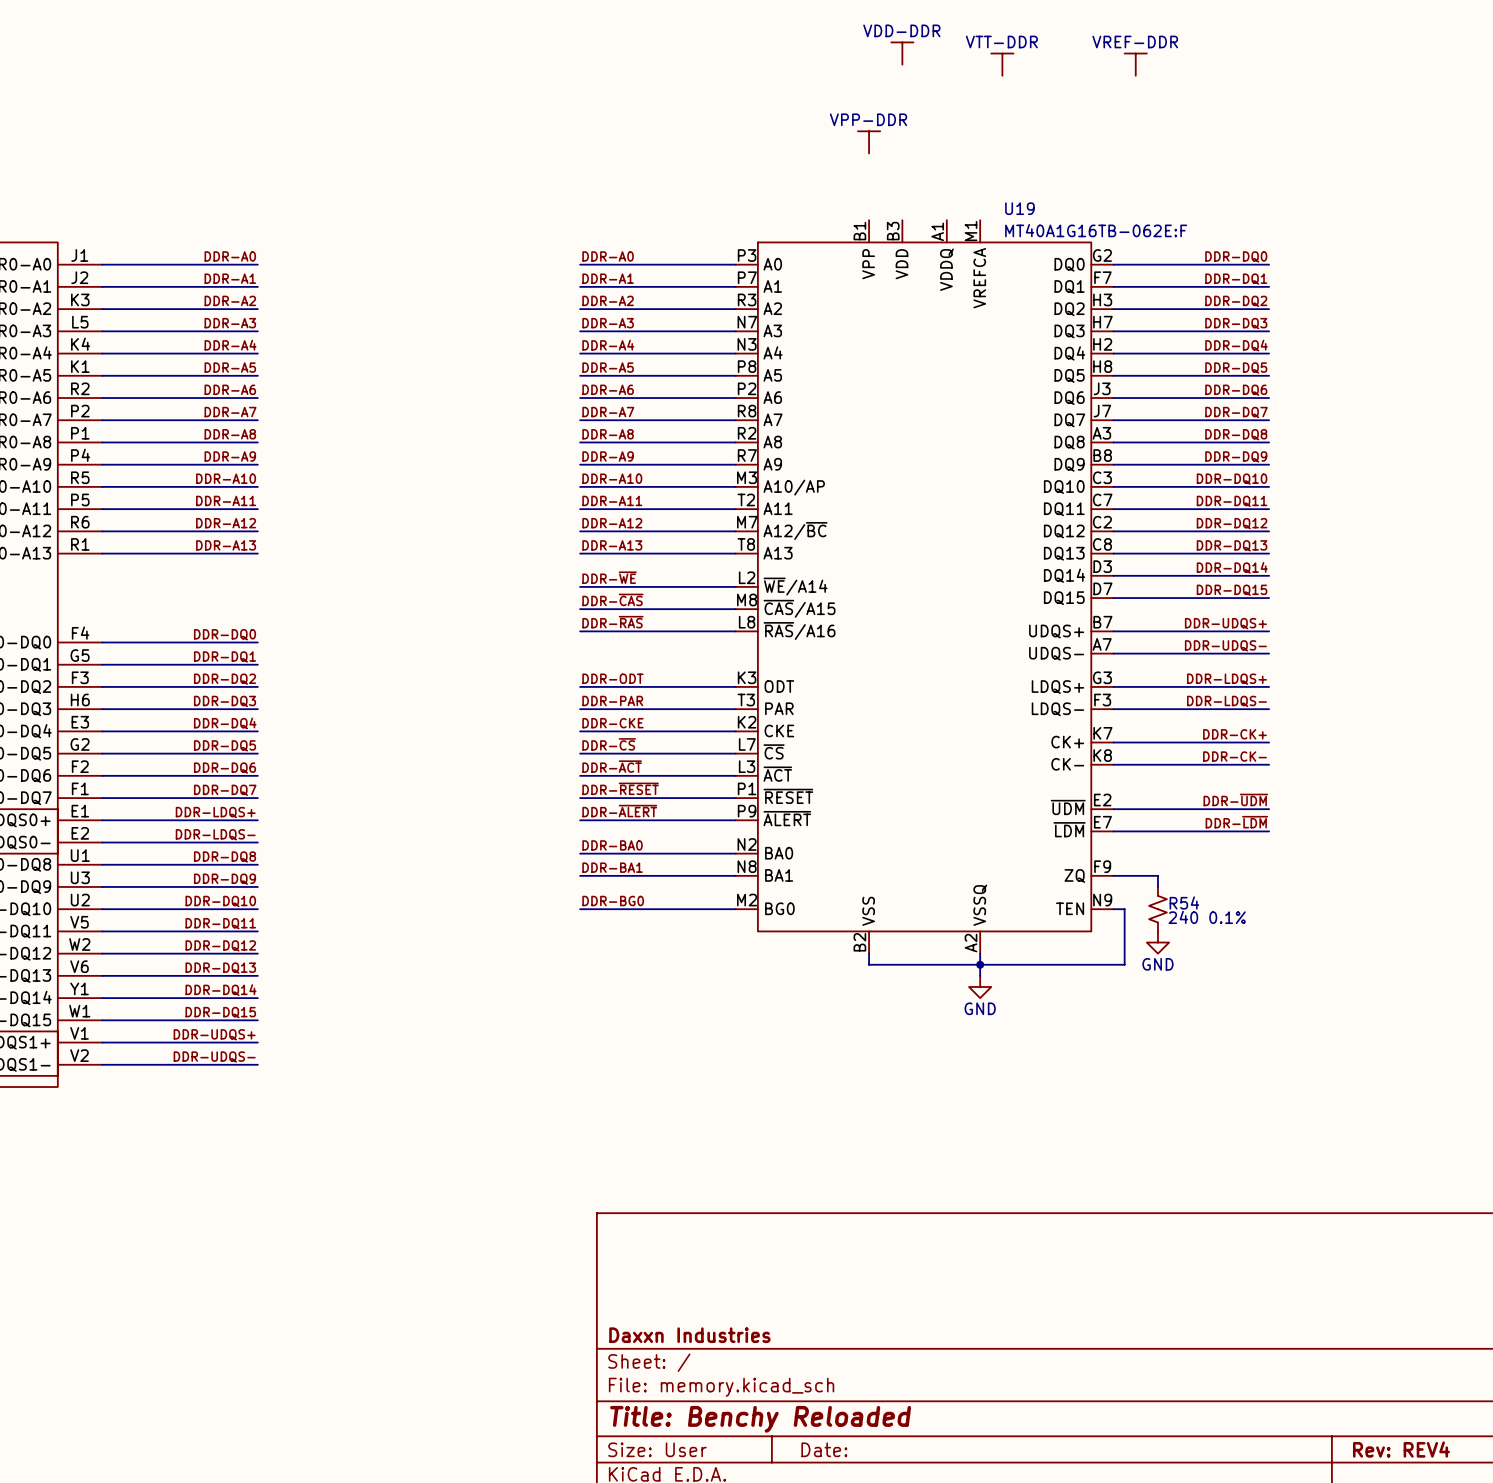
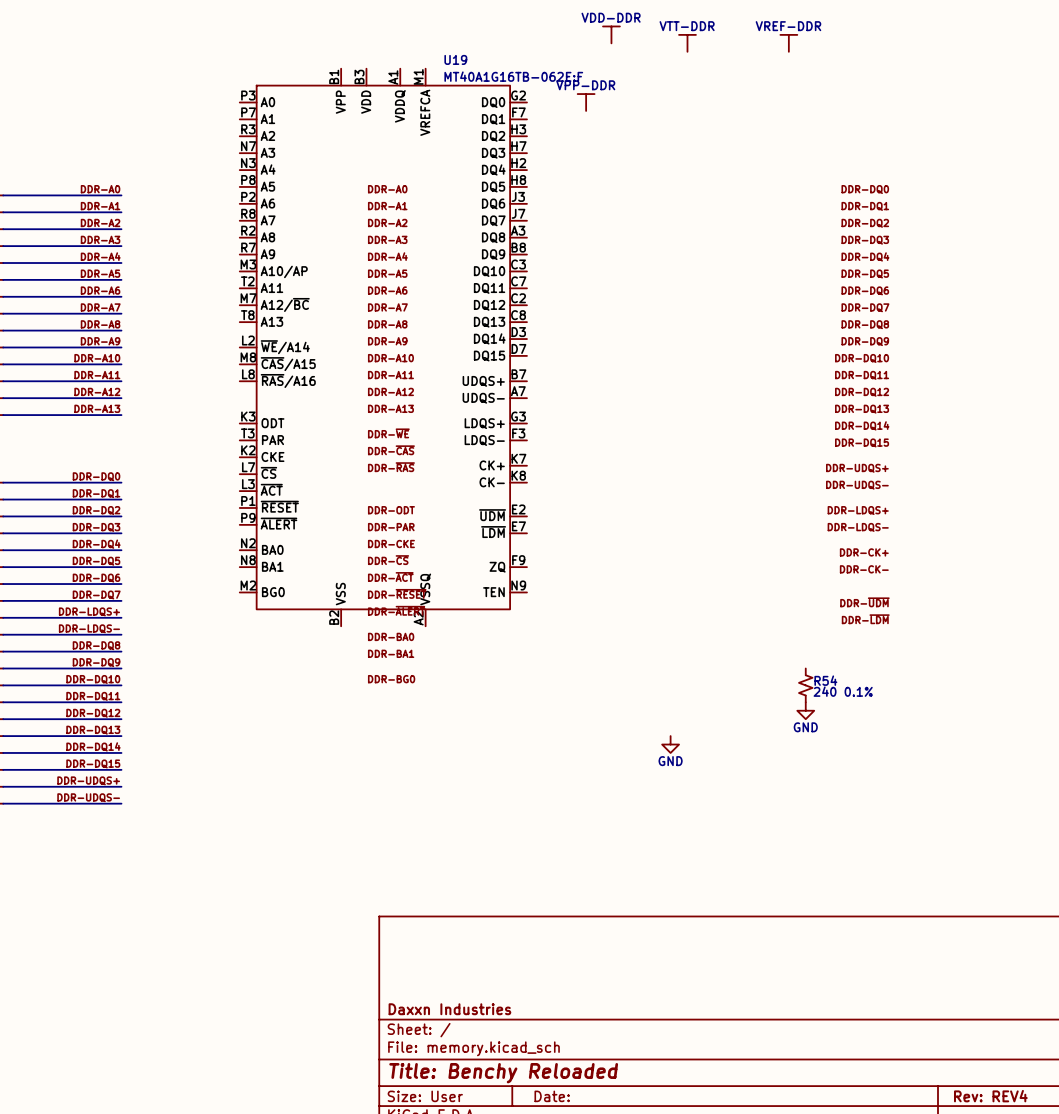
wire: (580, 264) (735, 264) -> none
wire: (1113, 264) (1269, 264) -> none
wire: (580, 286) (735, 286) -> none
wire: (1113, 286) (1269, 286) -> none
wire: (580, 309) (735, 309) -> none
wire: (1113, 309) (1269, 309) -> none
wire: (580, 331) (735, 331) -> none
wire: (1113, 331) (1269, 331) -> none
wire: (580, 353) (735, 353) -> none
wire: (1113, 353) (1269, 353) -> none
wire: (580, 375) (735, 375) -> none
wire: (1113, 375) (1269, 375) -> none
wire: (580, 398) (735, 398) -> none
wire: (1113, 398) (1269, 398) -> none
wire: (580, 420) (735, 420) -> none
wire: (1113, 420) (1269, 420) -> none
wire: (580, 442) (735, 442) -> none
wire: (1113, 442) (1269, 442) -> none
wire: (580, 464) (735, 464) -> none
wire: (1113, 464) (1269, 464) -> none
wire: (580, 486) (735, 486) -> none
wire: (1113, 486) (1269, 486) -> none
wire: (580, 509) (735, 509) -> none
wire: (1113, 509) (1269, 509) -> none
wire: (580, 531) (735, 531) -> none
wire: (1113, 531) (1269, 531) -> none
wire: (580, 553) (735, 553) -> none
wire: (1113, 553) (1269, 553) -> none
wire: (1113, 575) (1269, 575) -> none
wire: (580, 586) (735, 586) -> none
U19 position: (924, 586) -> (383, 347)
wire: (1113, 598) (1269, 598) -> none
wire: (580, 609) (735, 609) -> none
wire: (580, 631) (735, 631) -> none
wire: (1113, 631) (1269, 631) -> none
wire: (1113, 653) (1269, 653) -> none
wire: (580, 686) (735, 686) -> none
wire: (1113, 686) (1269, 686) -> none
wire: (580, 709) (735, 709) -> none
wire: (1113, 709) (1269, 709) -> none
wire: (580, 731) (735, 731) -> none
wire: (1113, 742) (1269, 742) -> none
wire: (580, 753) (735, 753) -> none
wire: (1113, 764) (1269, 764) -> none
wire: (580, 775) (735, 775) -> none
wire: (580, 798) (735, 798) -> none
wire: (1113, 809) (1269, 809) -> none
wire: (580, 820) (735, 820) -> none
wire: (1113, 831) (1269, 831) -> none
wire: (580, 853) (735, 853) -> none
wire: (580, 875) (735, 875) -> none
wire: (1113, 875) (1157, 875) (1157, 886) -> none
wire: (580, 909) (735, 909) -> none
wire: (1113, 909) (1124, 909) (1124, 964) (869, 964) (869, 953) -> none
wire: (980, 953) (980, 975) -> none
junction: (980, 964) -> none

